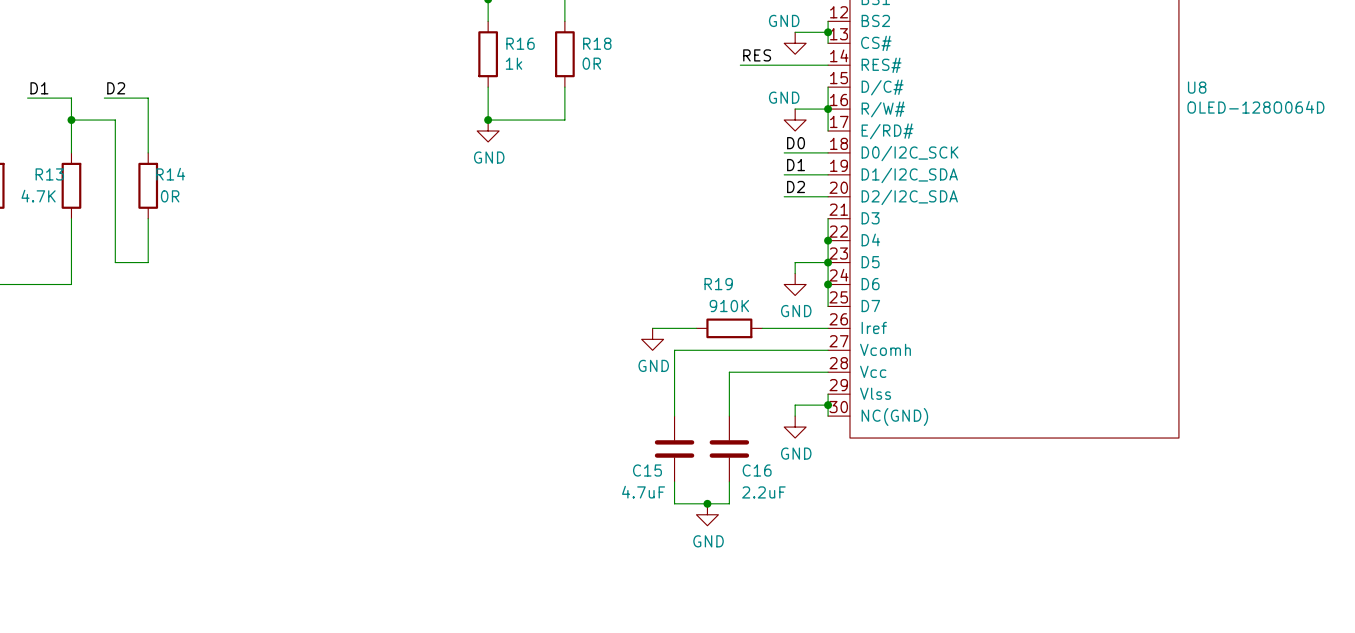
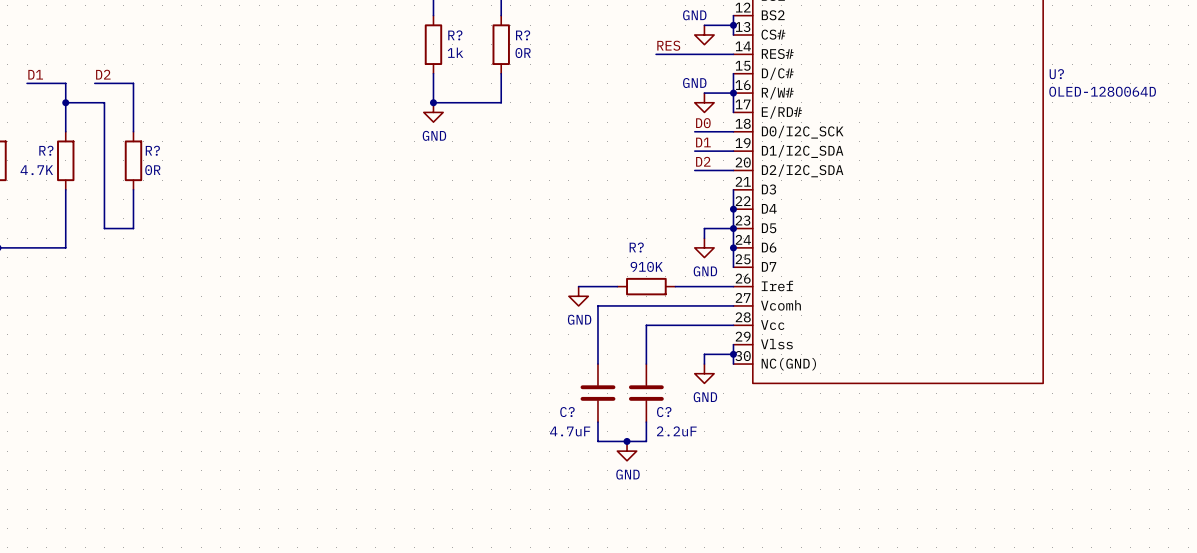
R16 name: R16 (520, 43) -> R? (455, 35)
R18 name: R18 (597, 43) -> R? (523, 35)
U8 name: U8 (1197, 87) -> U? (1056, 74)
R13 name: R13 (49, 174) -> R? (46, 150)
R14 name: R14 (170, 174) -> R? (152, 150)
R19 name: R19 (718, 284) -> R? (636, 247)
C15 name: C15 (647, 470) -> C? (567, 412)
C16 name: C16 (757, 470) -> C? (664, 412)

